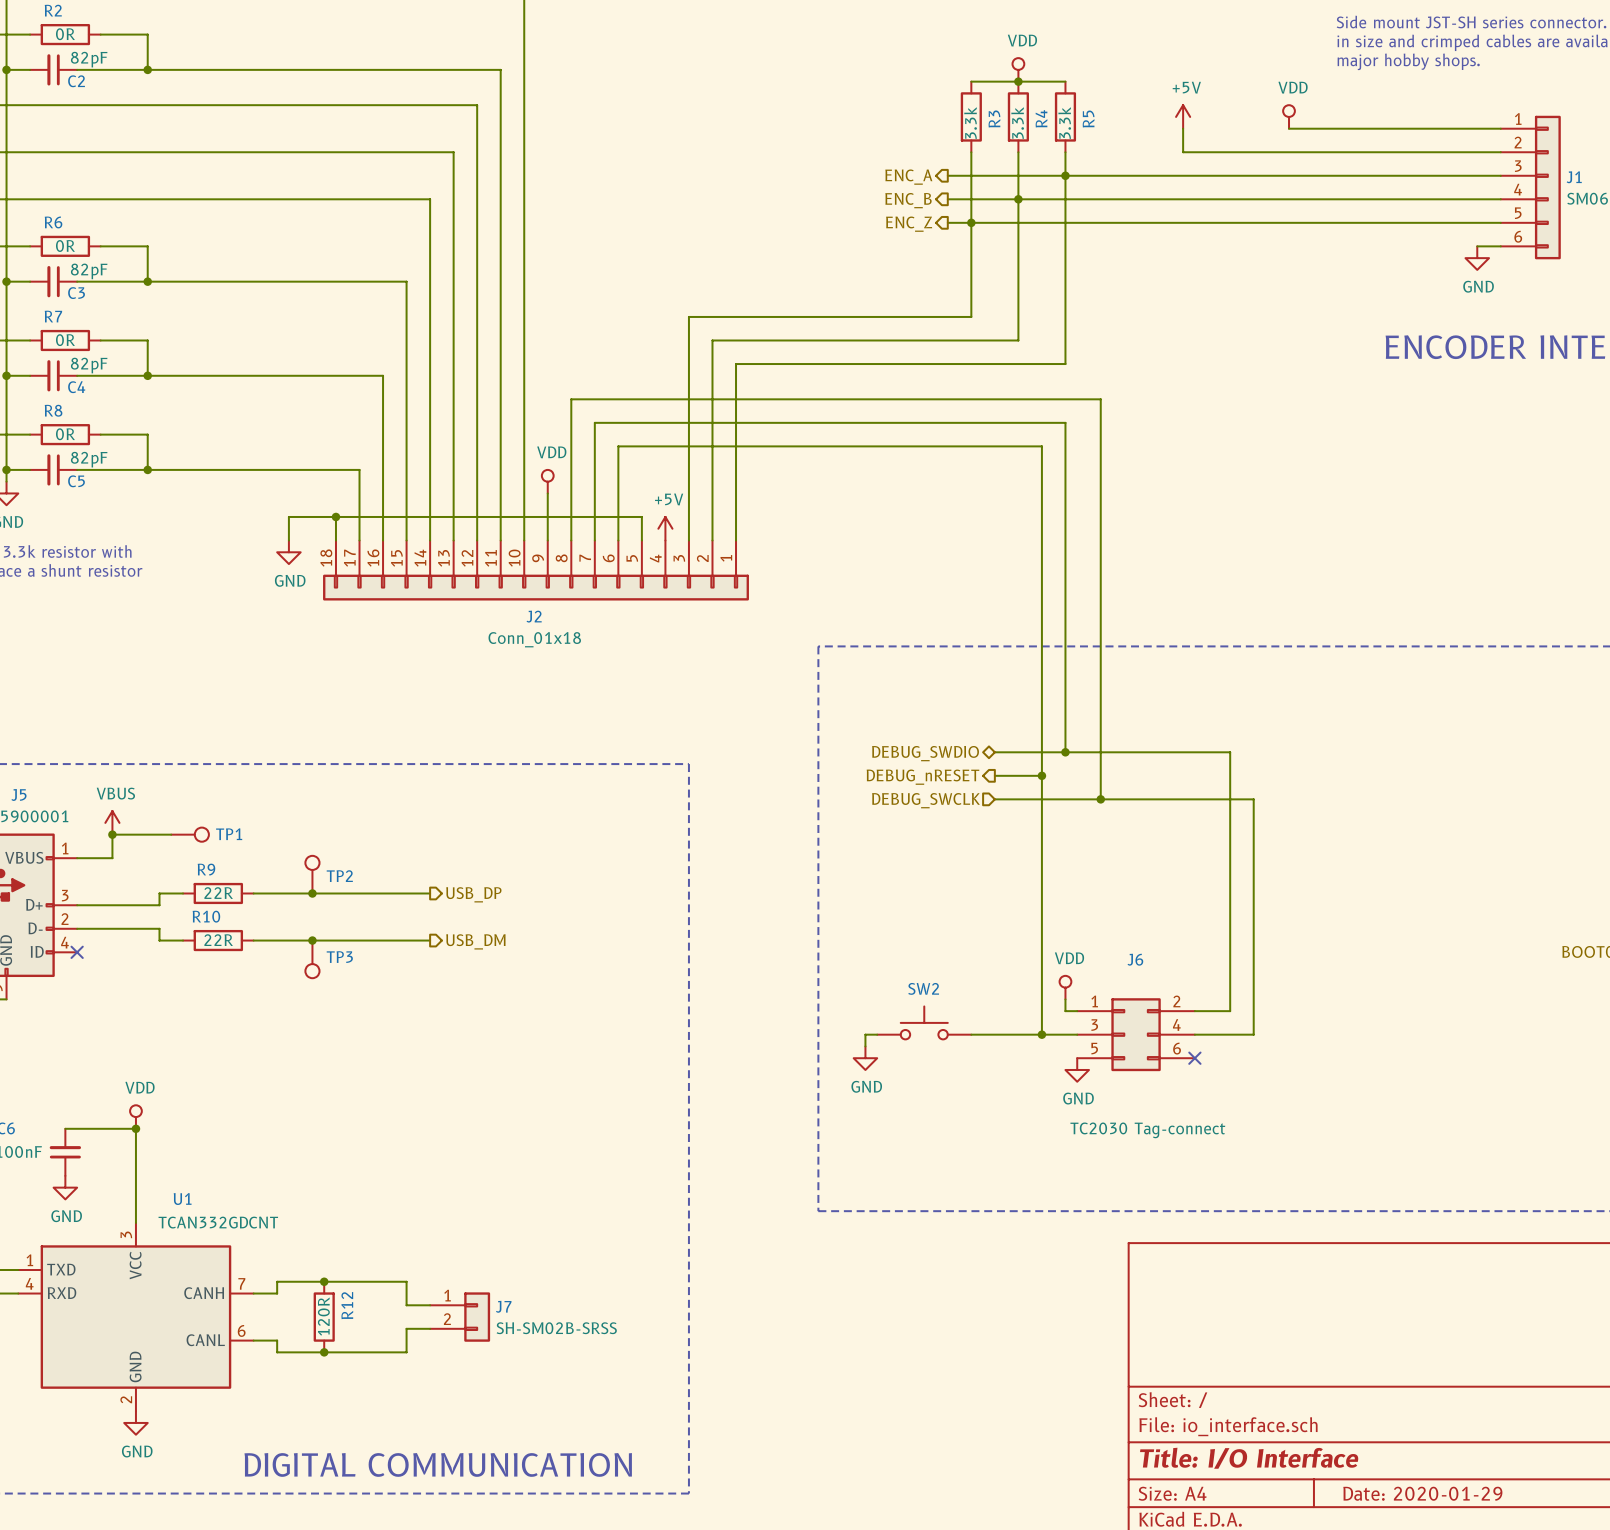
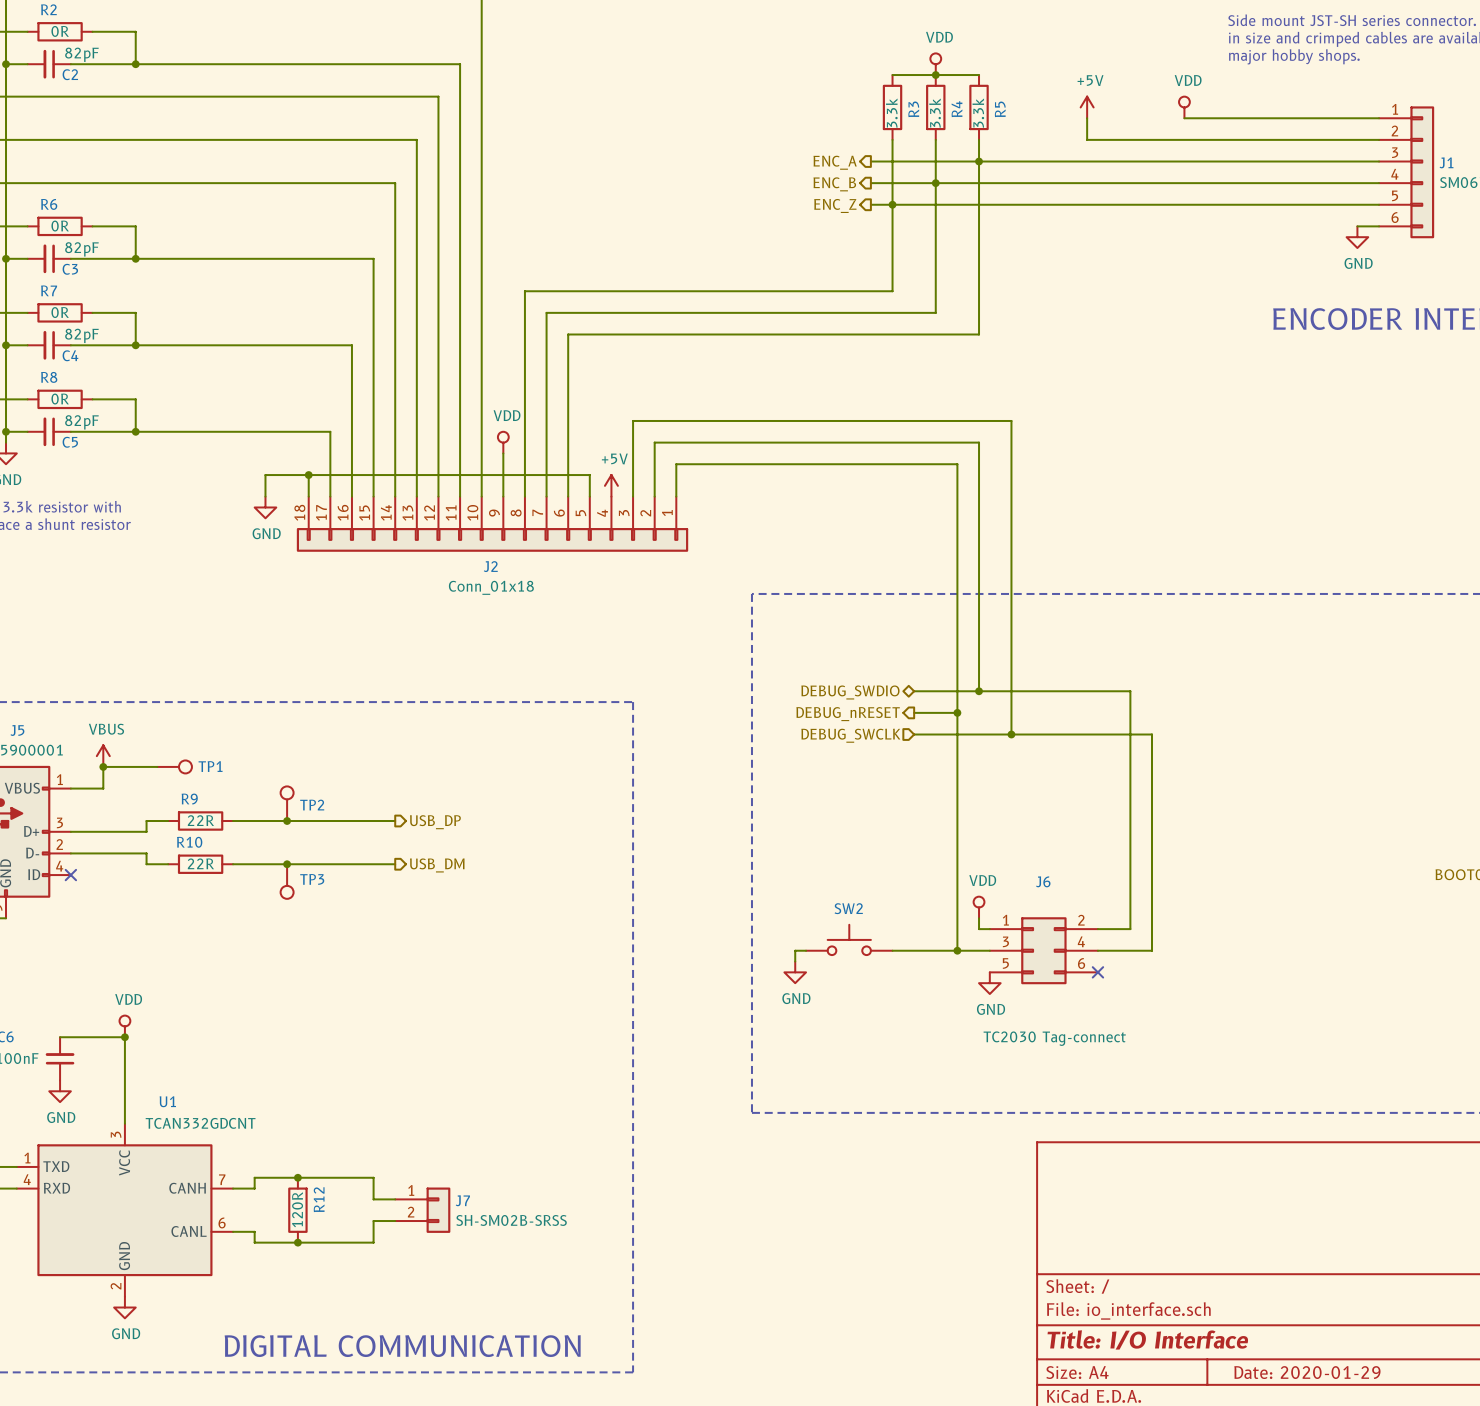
wire: (688, 316) (688, 458) -> (633, 291) (524, 291) (524, 366)
wire: (712, 340) (712, 481) -> (654, 312) (546, 312) (546, 388)
wire: (736, 364) (736, 505) -> (676, 334) (568, 334) (568, 410)
wire: (571, 399) (1100, 399) (1100, 458) -> (633, 420) (1011, 420)
wire: (594, 422) (1065, 422) (1065, 481) -> (654, 442) (979, 442)
wire: (618, 446) (1041, 446) (1041, 505) -> (676, 464) (957, 464)

